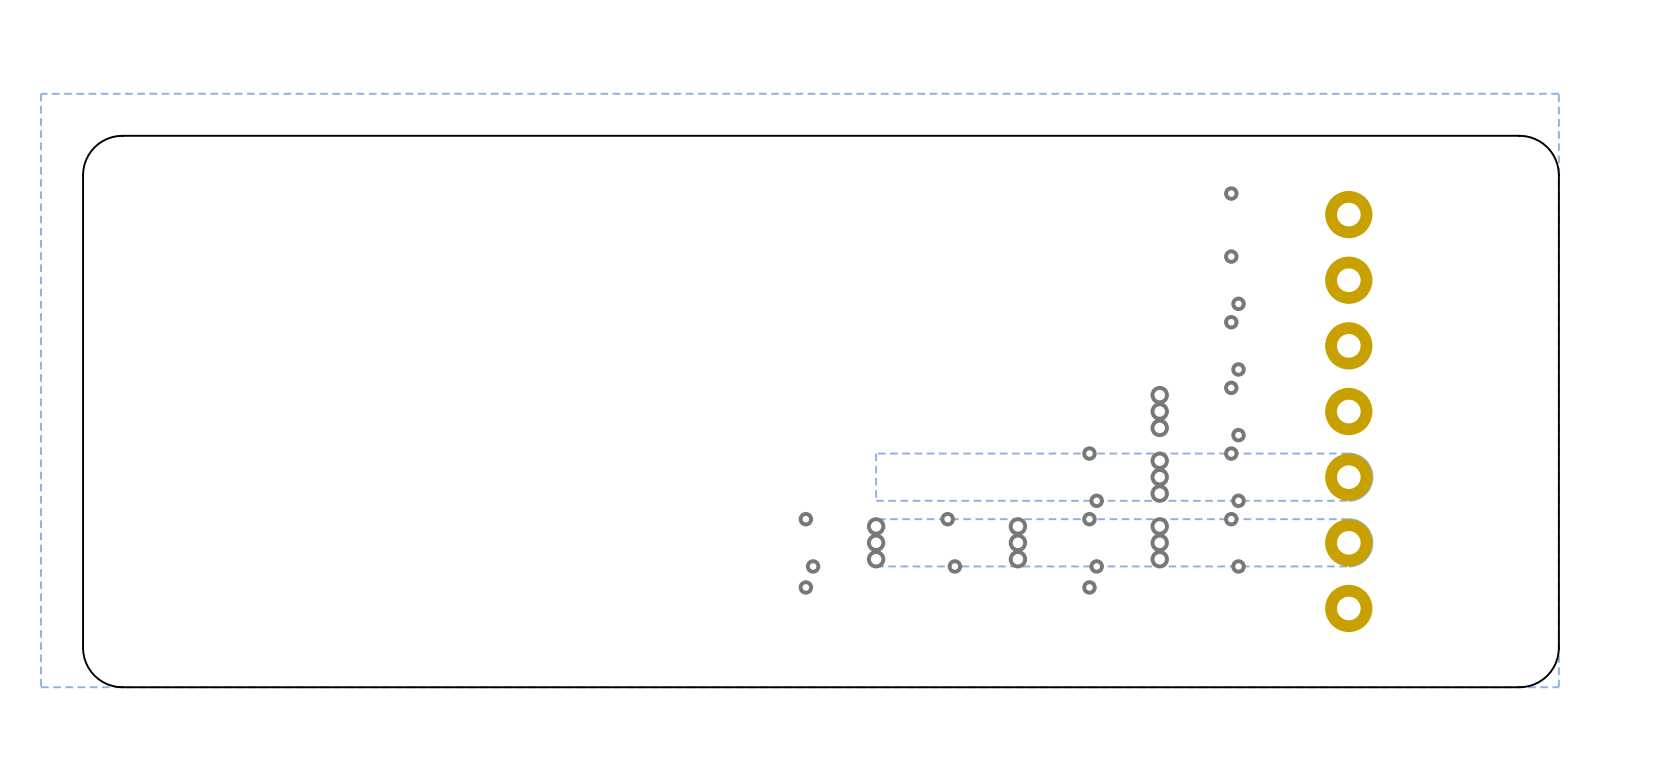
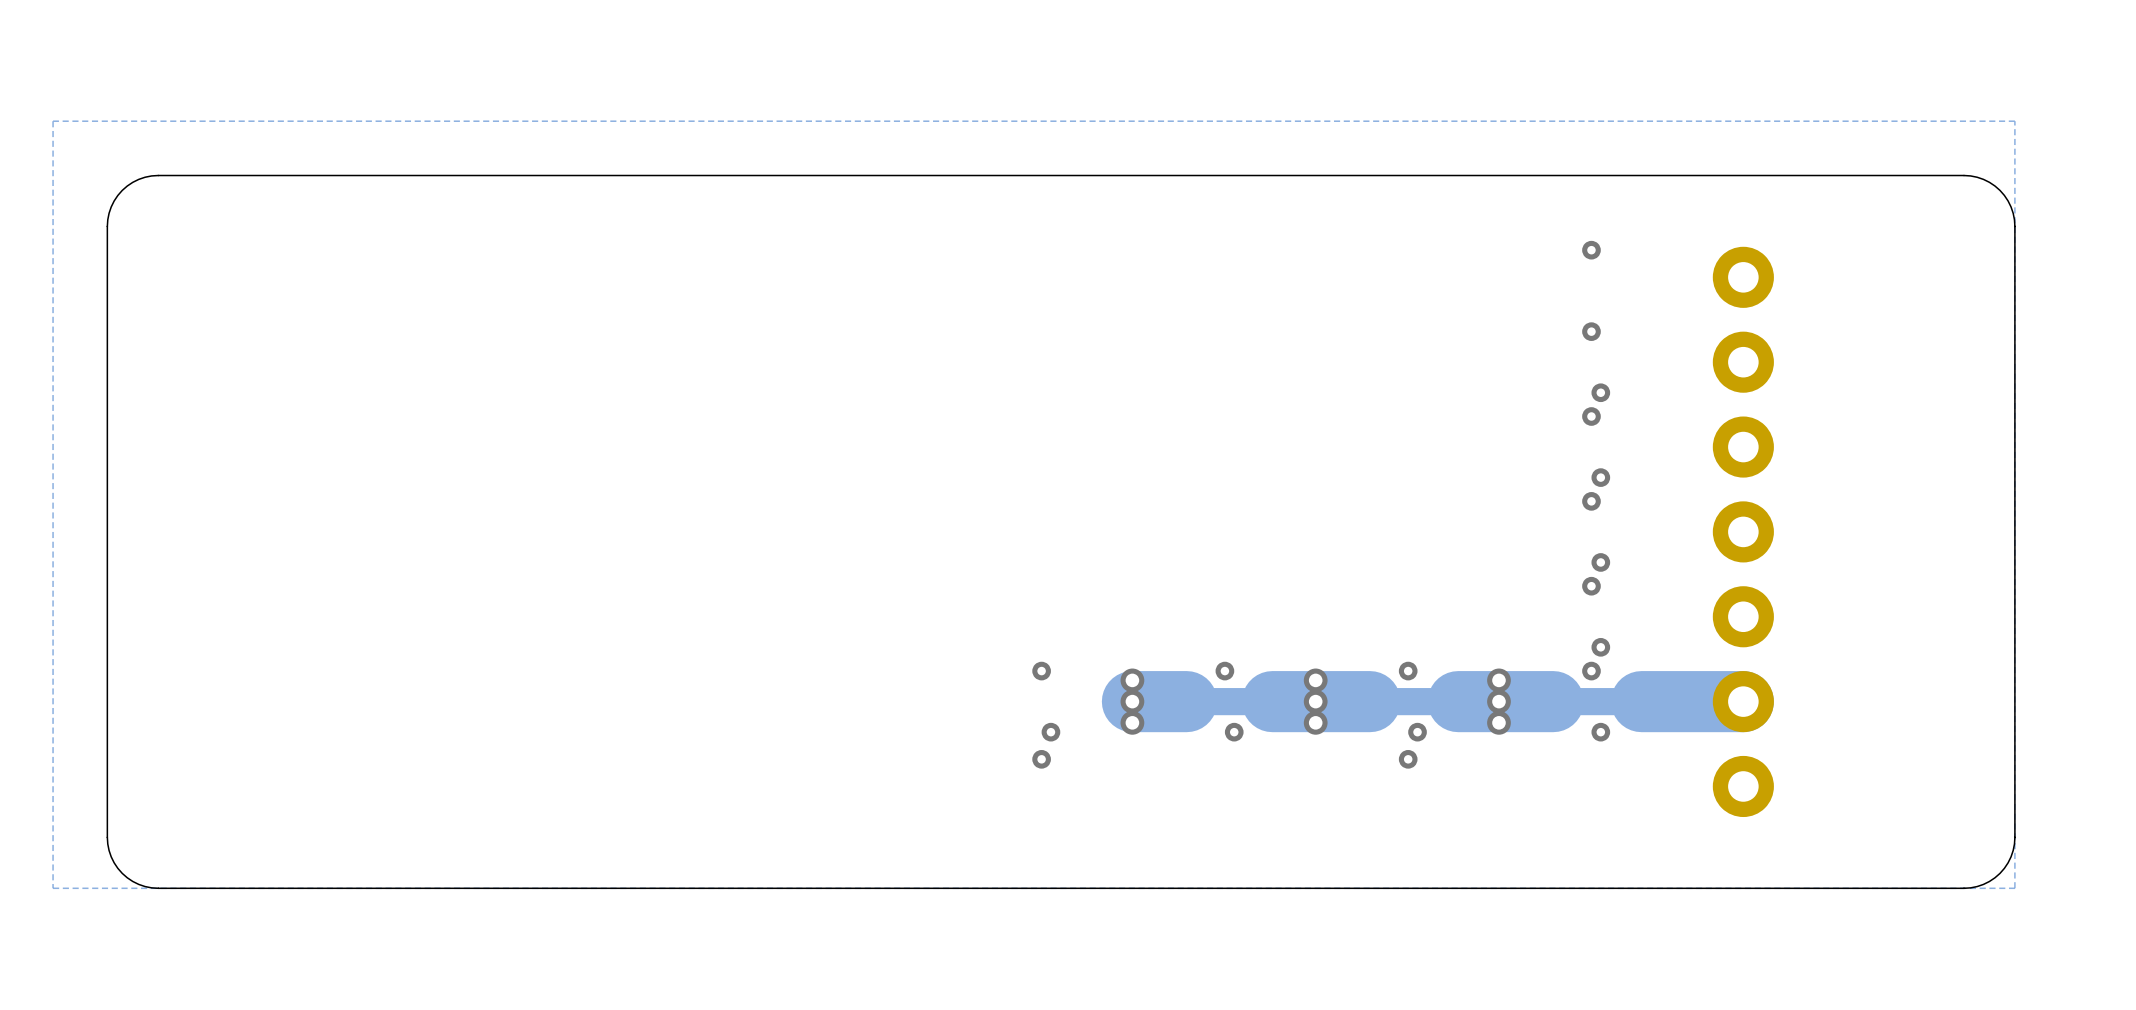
via: (1159, 395) -> none
via: (1159, 411) -> none
via: (1159, 427) -> none
via: (1089, 453) -> none
zone outline: (1348, 453) (876, 453) (876, 500) (1351, 500) (1360, 497) (1367, 491) (1371, 483) (1372, 474) (1369, 465) (1363, 458) (1348, 453) -> none
via: (1159, 460) -> none
via: (1159, 477) -> none
via: (1159, 493) -> none
via: (1096, 500) -> none
zone outline: (1348, 519) (876, 519) (876, 566) (1351, 566) (1360, 563) (1367, 557) (1371, 548) (1372, 539) (1369, 531) (1363, 524) (1348, 519) -> none
track: none -> (1743, 701) (1132, 701)

